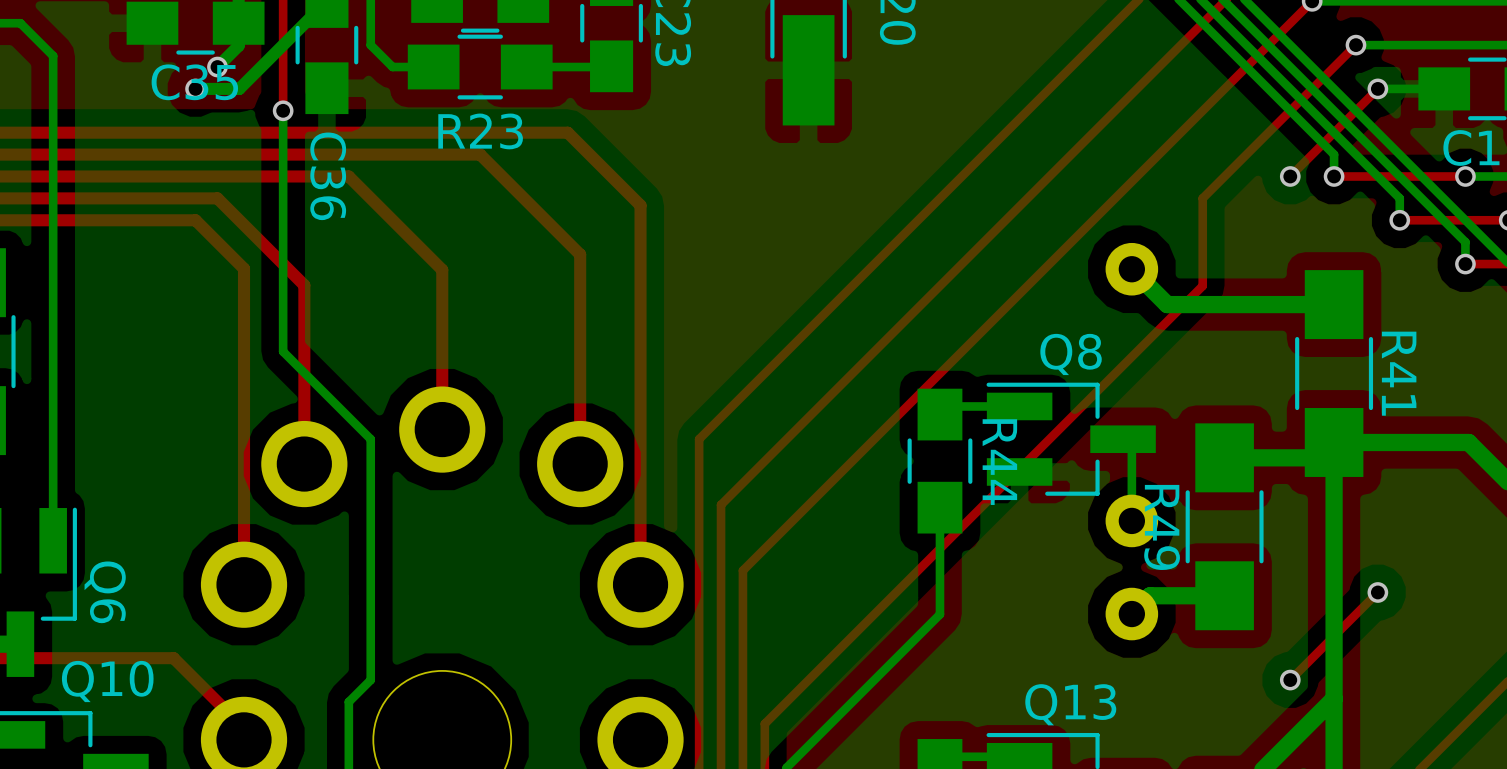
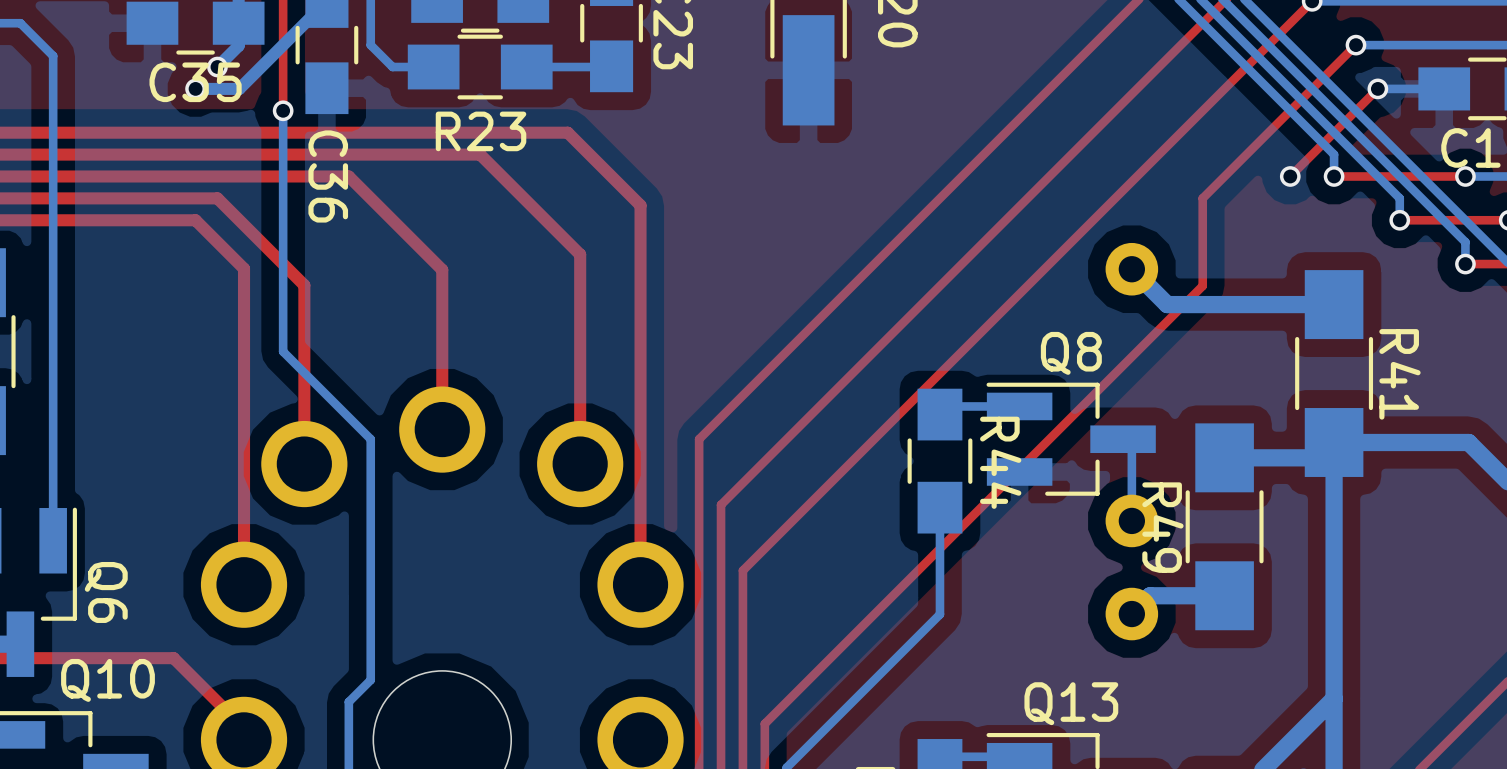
top track: (1377, 592) (1290, 680) -> none
via: (1377, 592) -> none
via: (1290, 680) -> none

